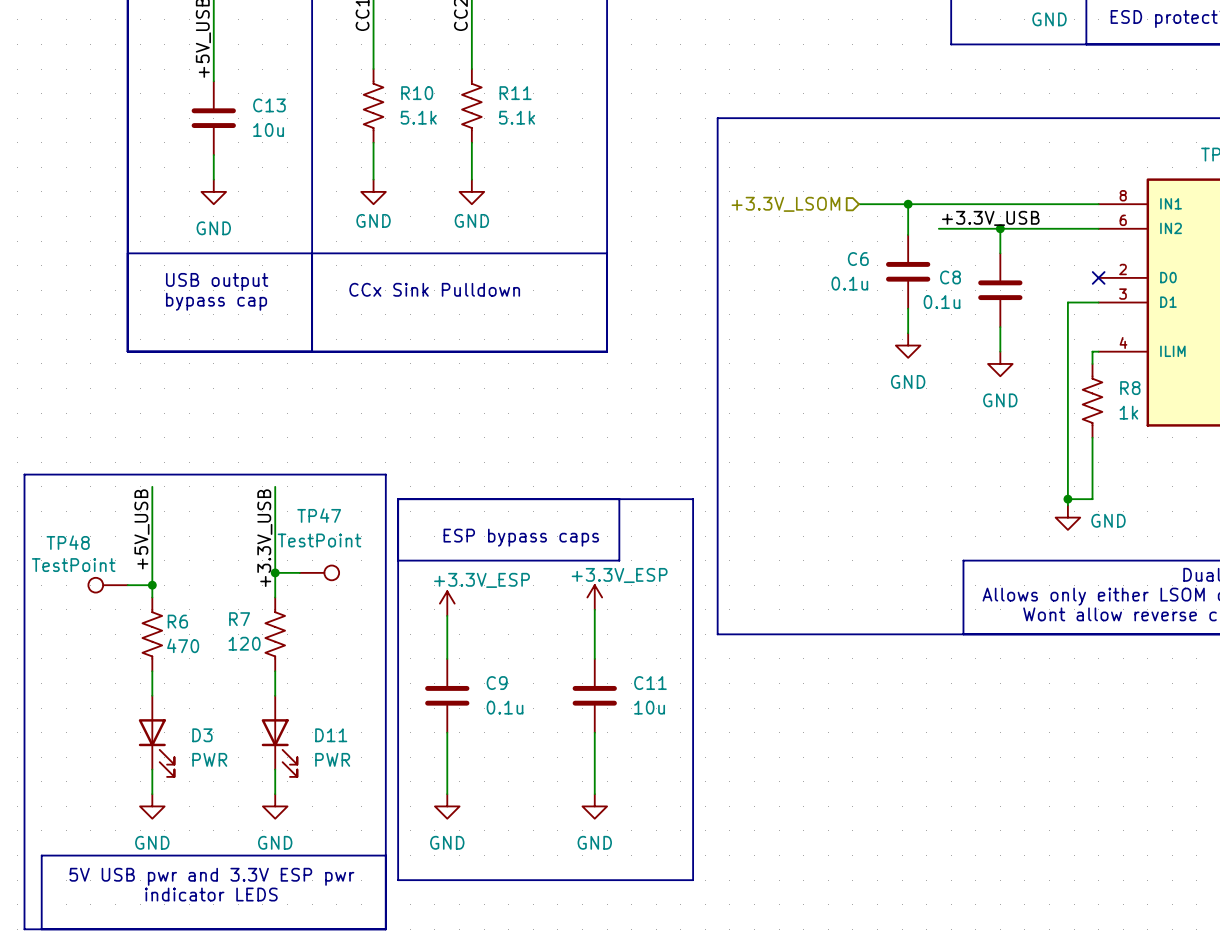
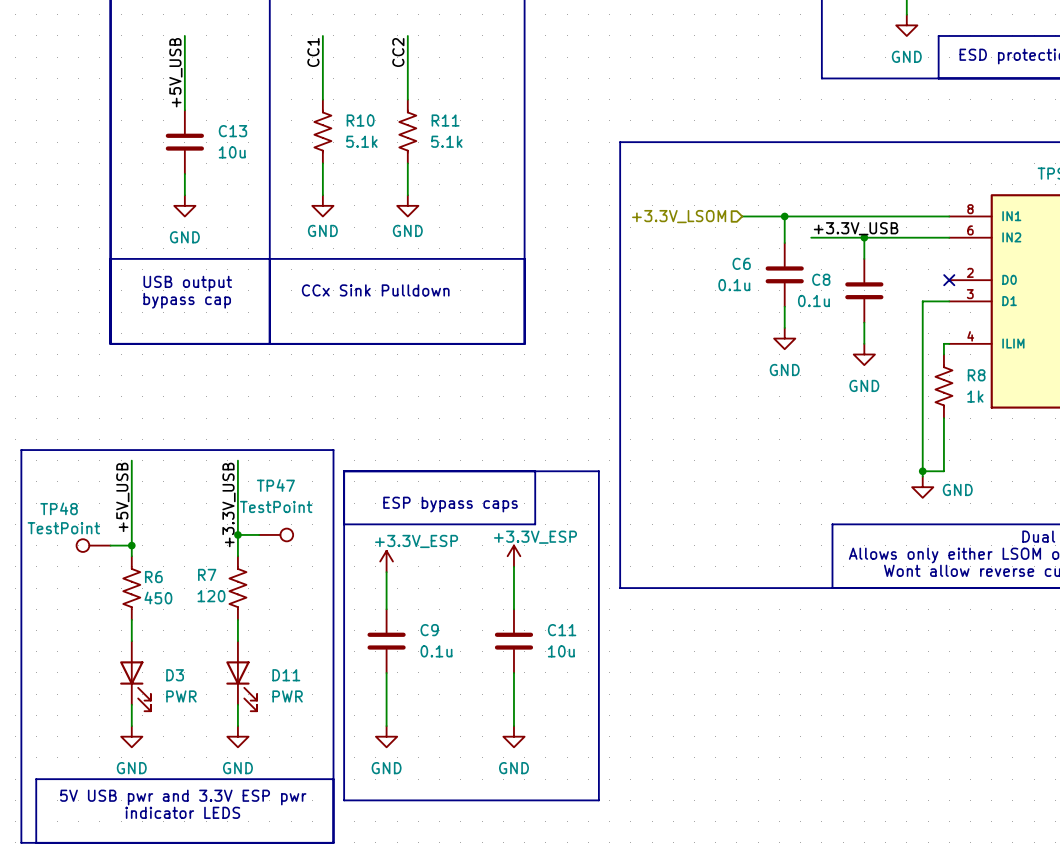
R6 value: 470 (183, 645) -> 450 (158, 598)

